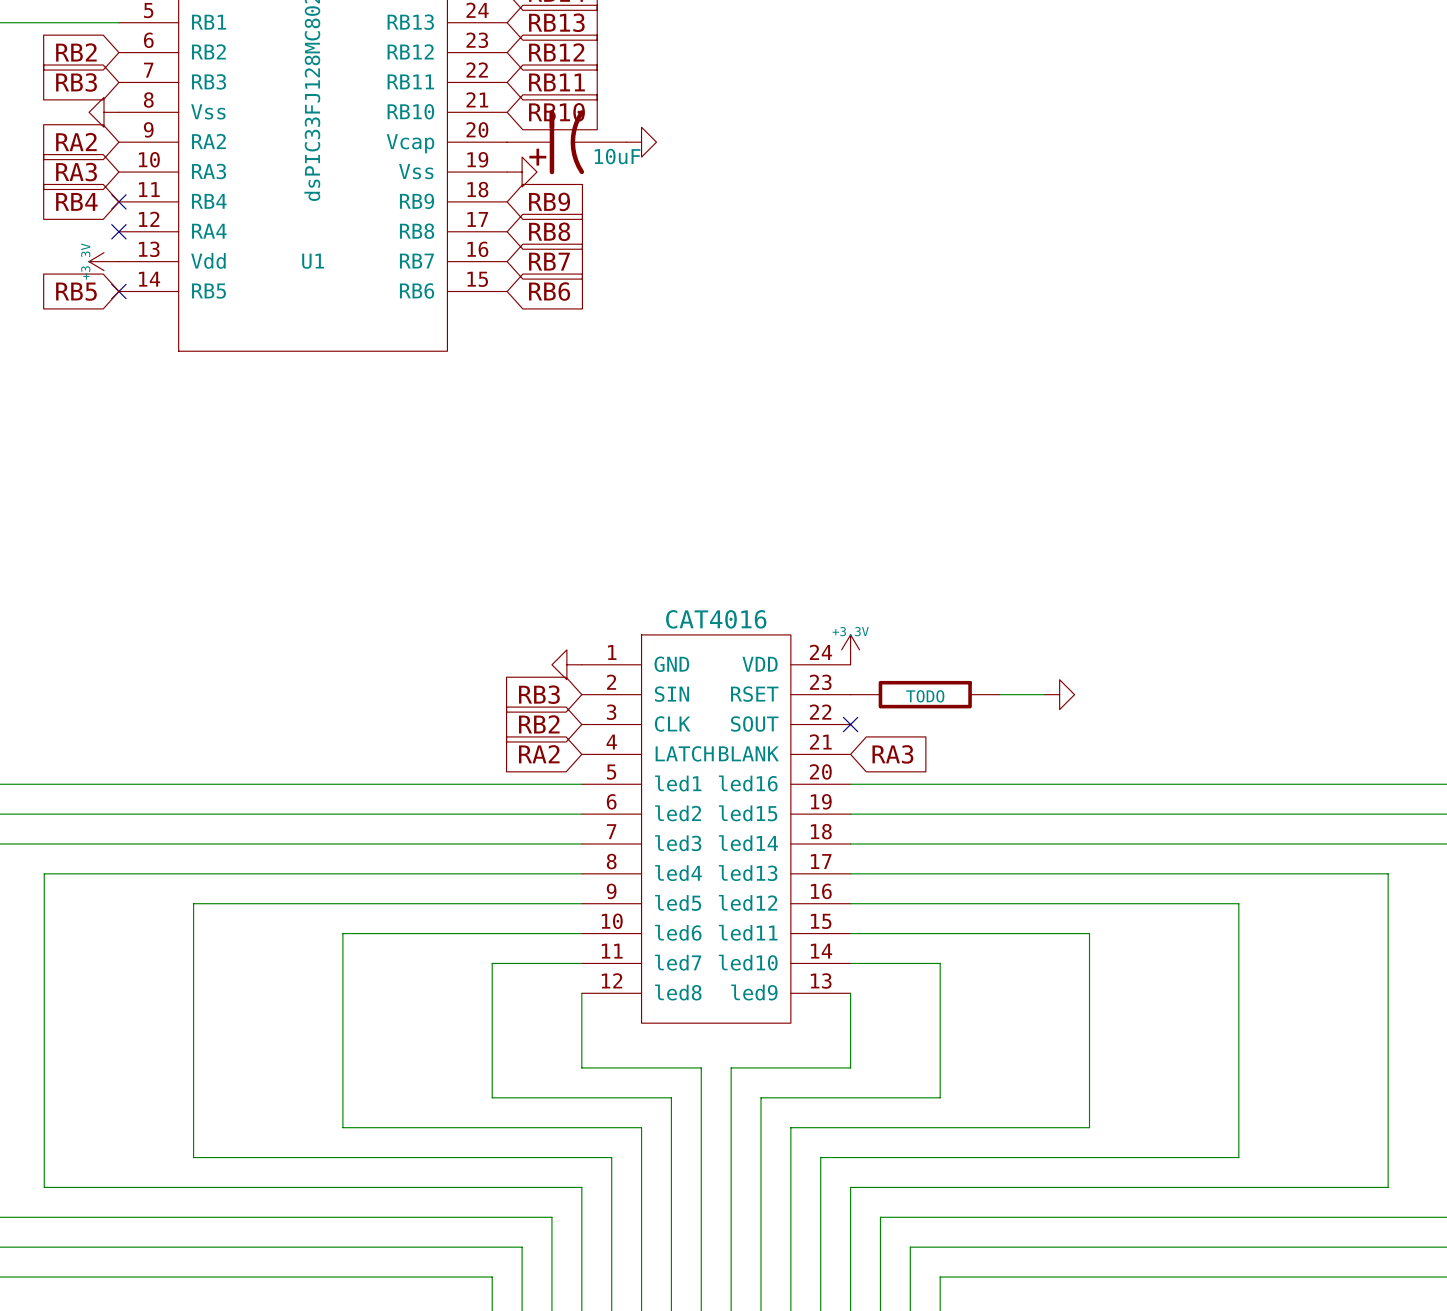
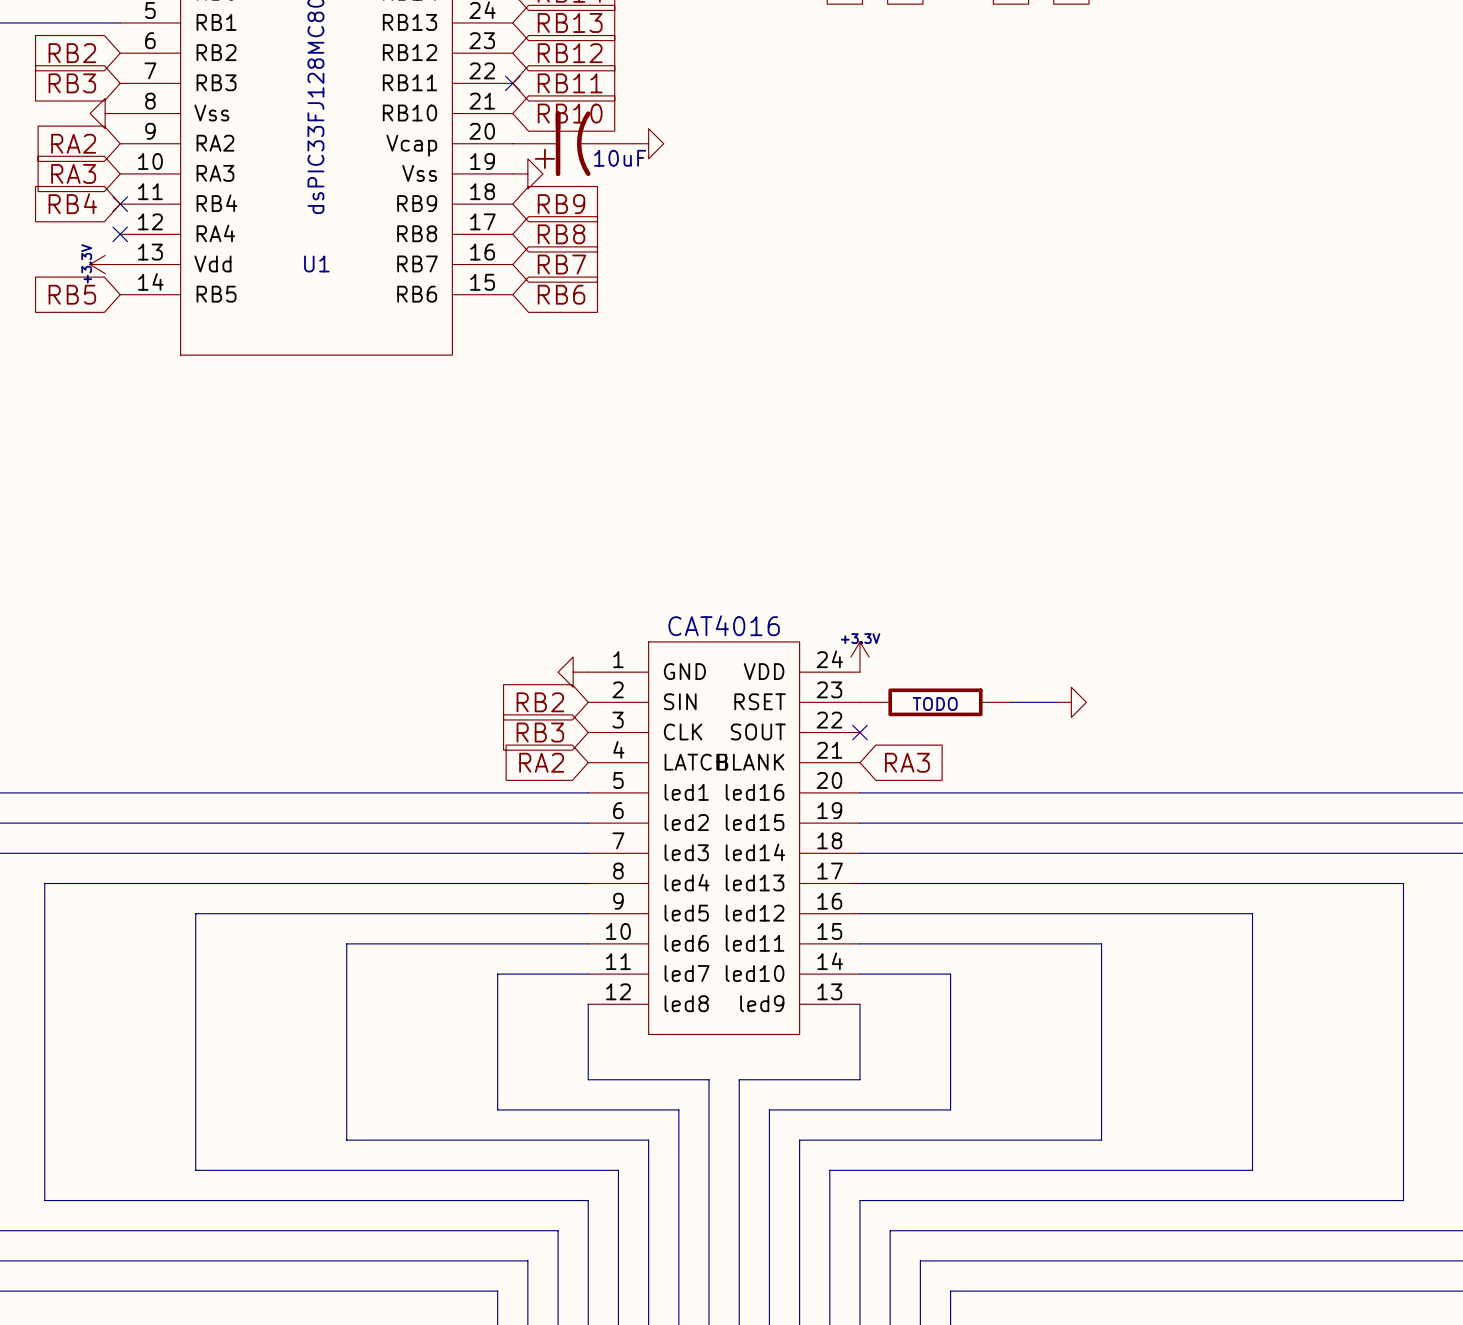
no-connect mark: none -> (512, 83)
no-connect mark: (118, 291) -> none
global label: RB3 (539, 694) -> RB2 (540, 702)
global label: RB2 (539, 724) -> RB3 (540, 732)

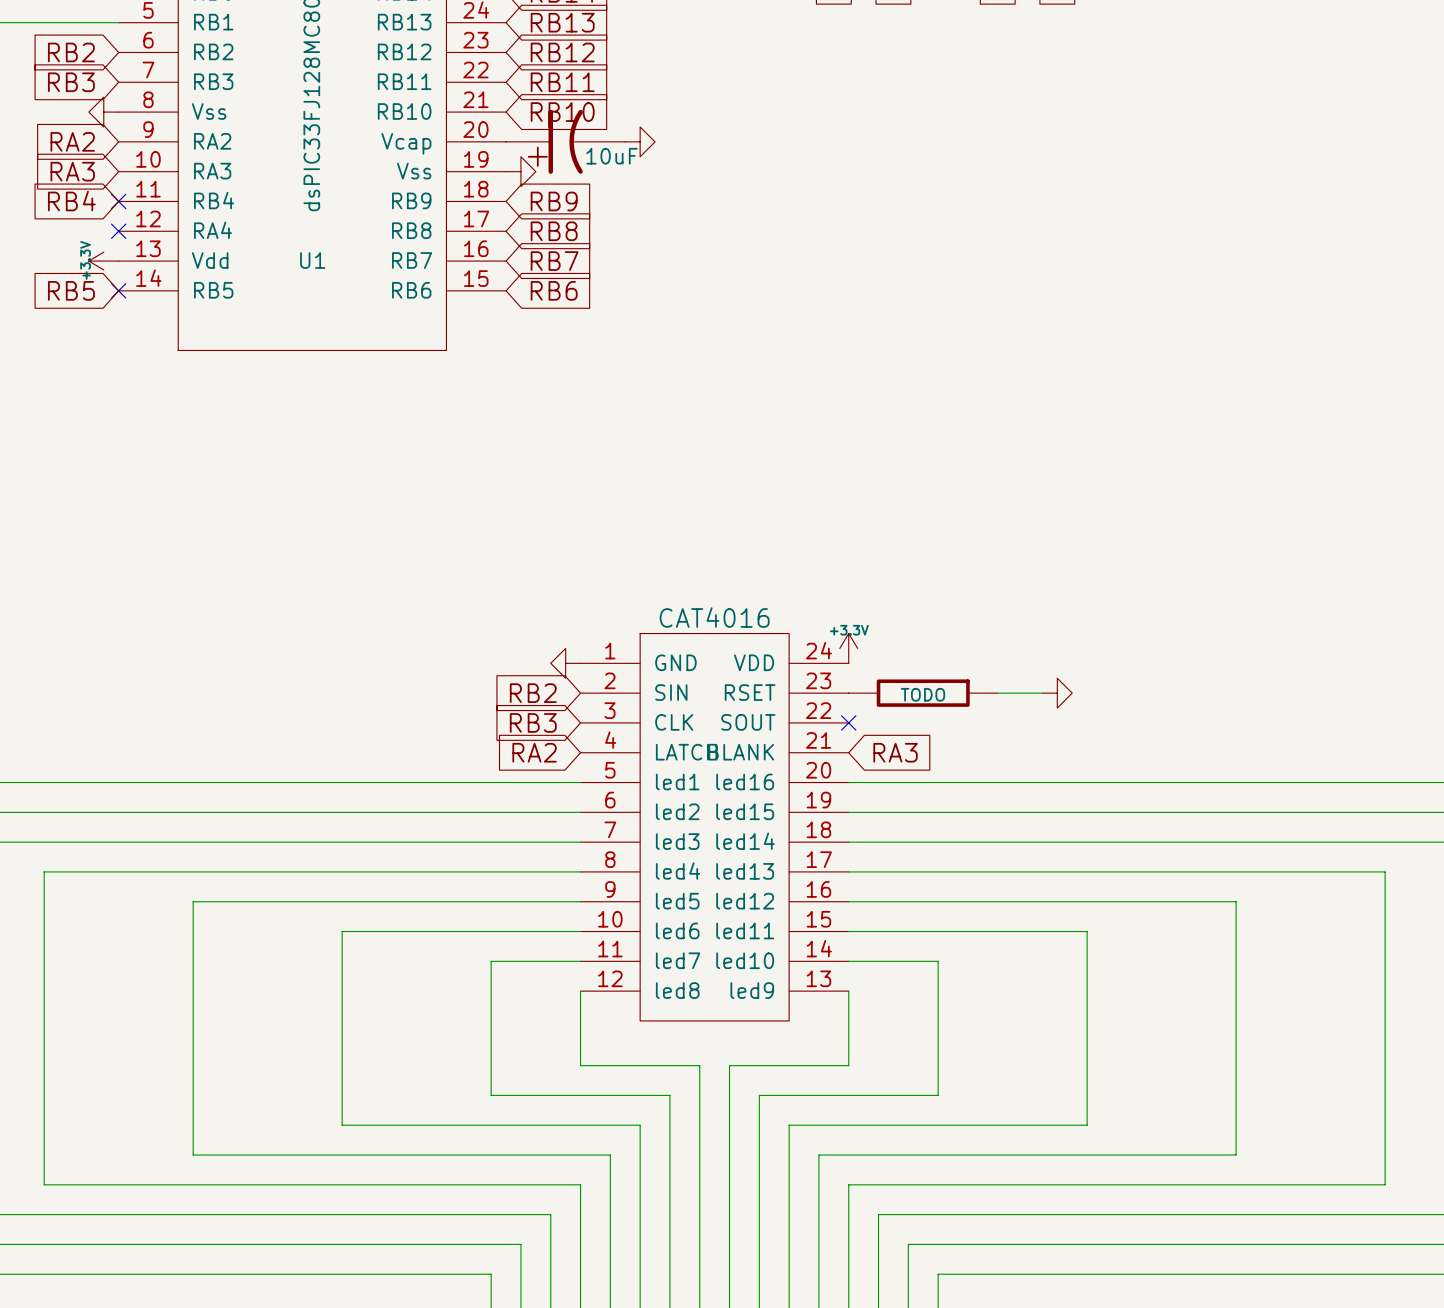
no-connect mark: (512, 83) -> none
no-connect mark: none -> (118, 290)

